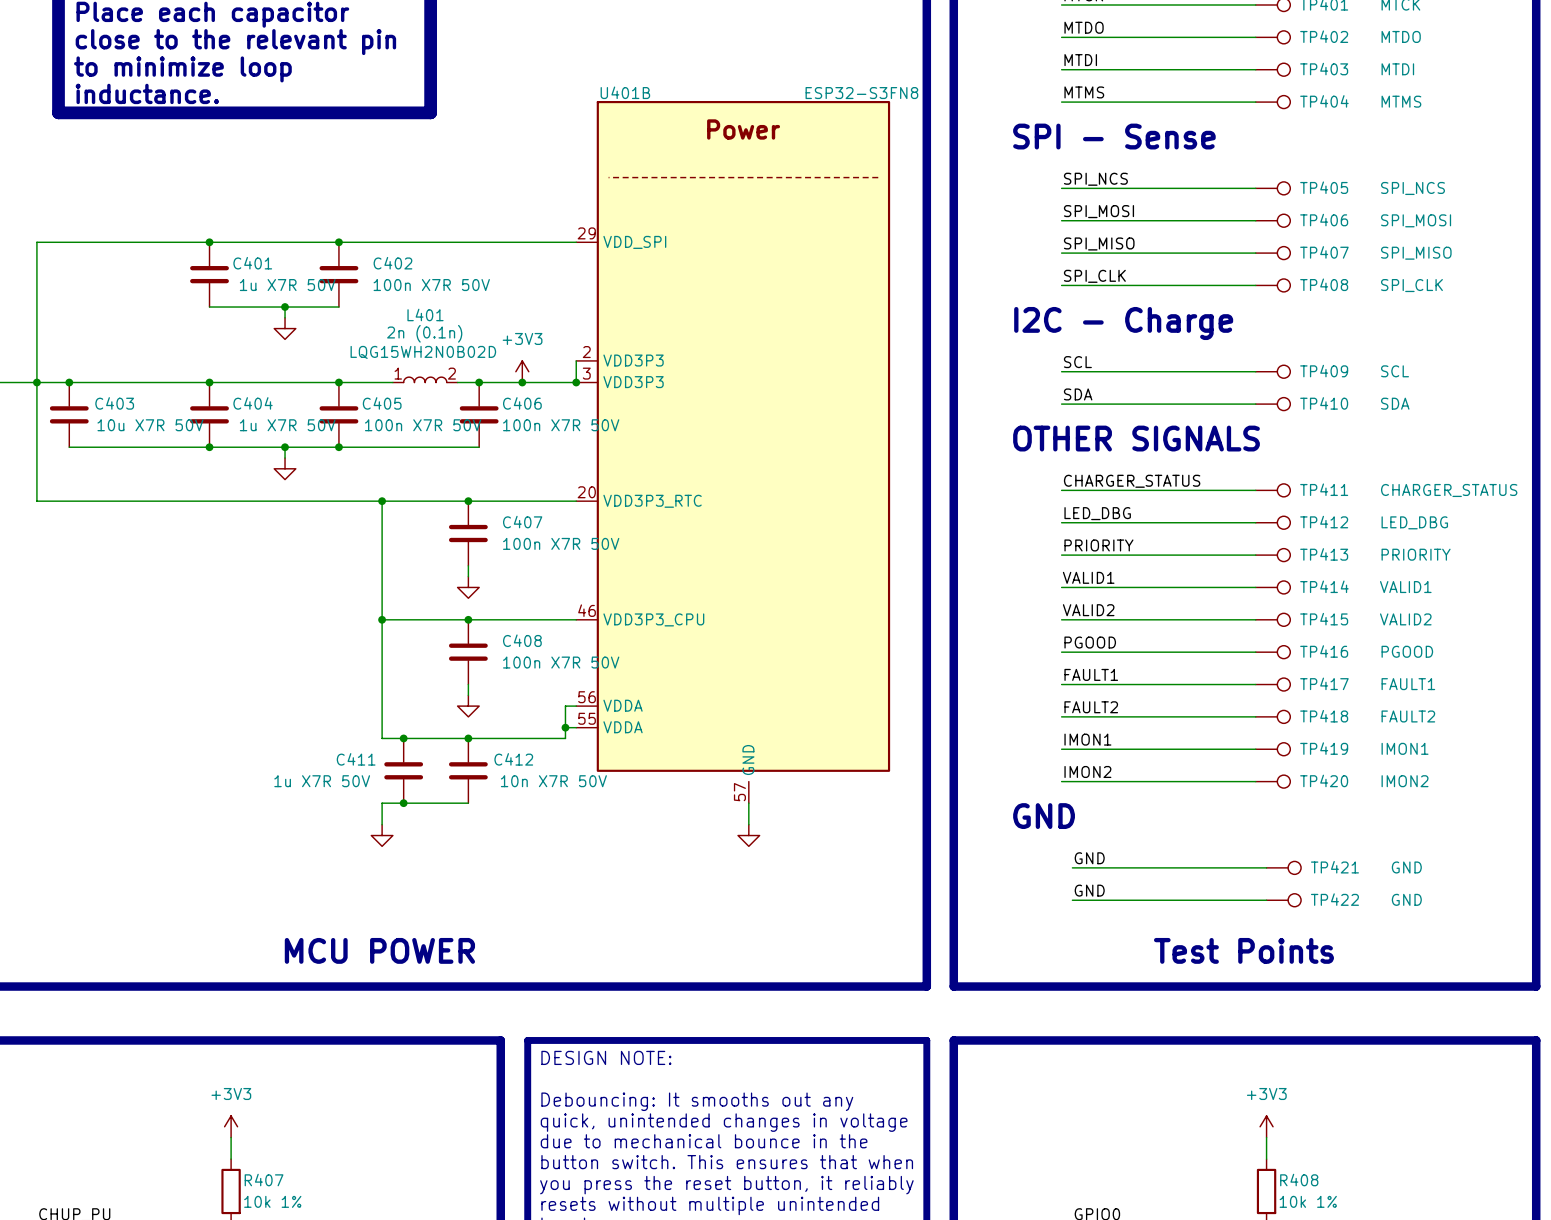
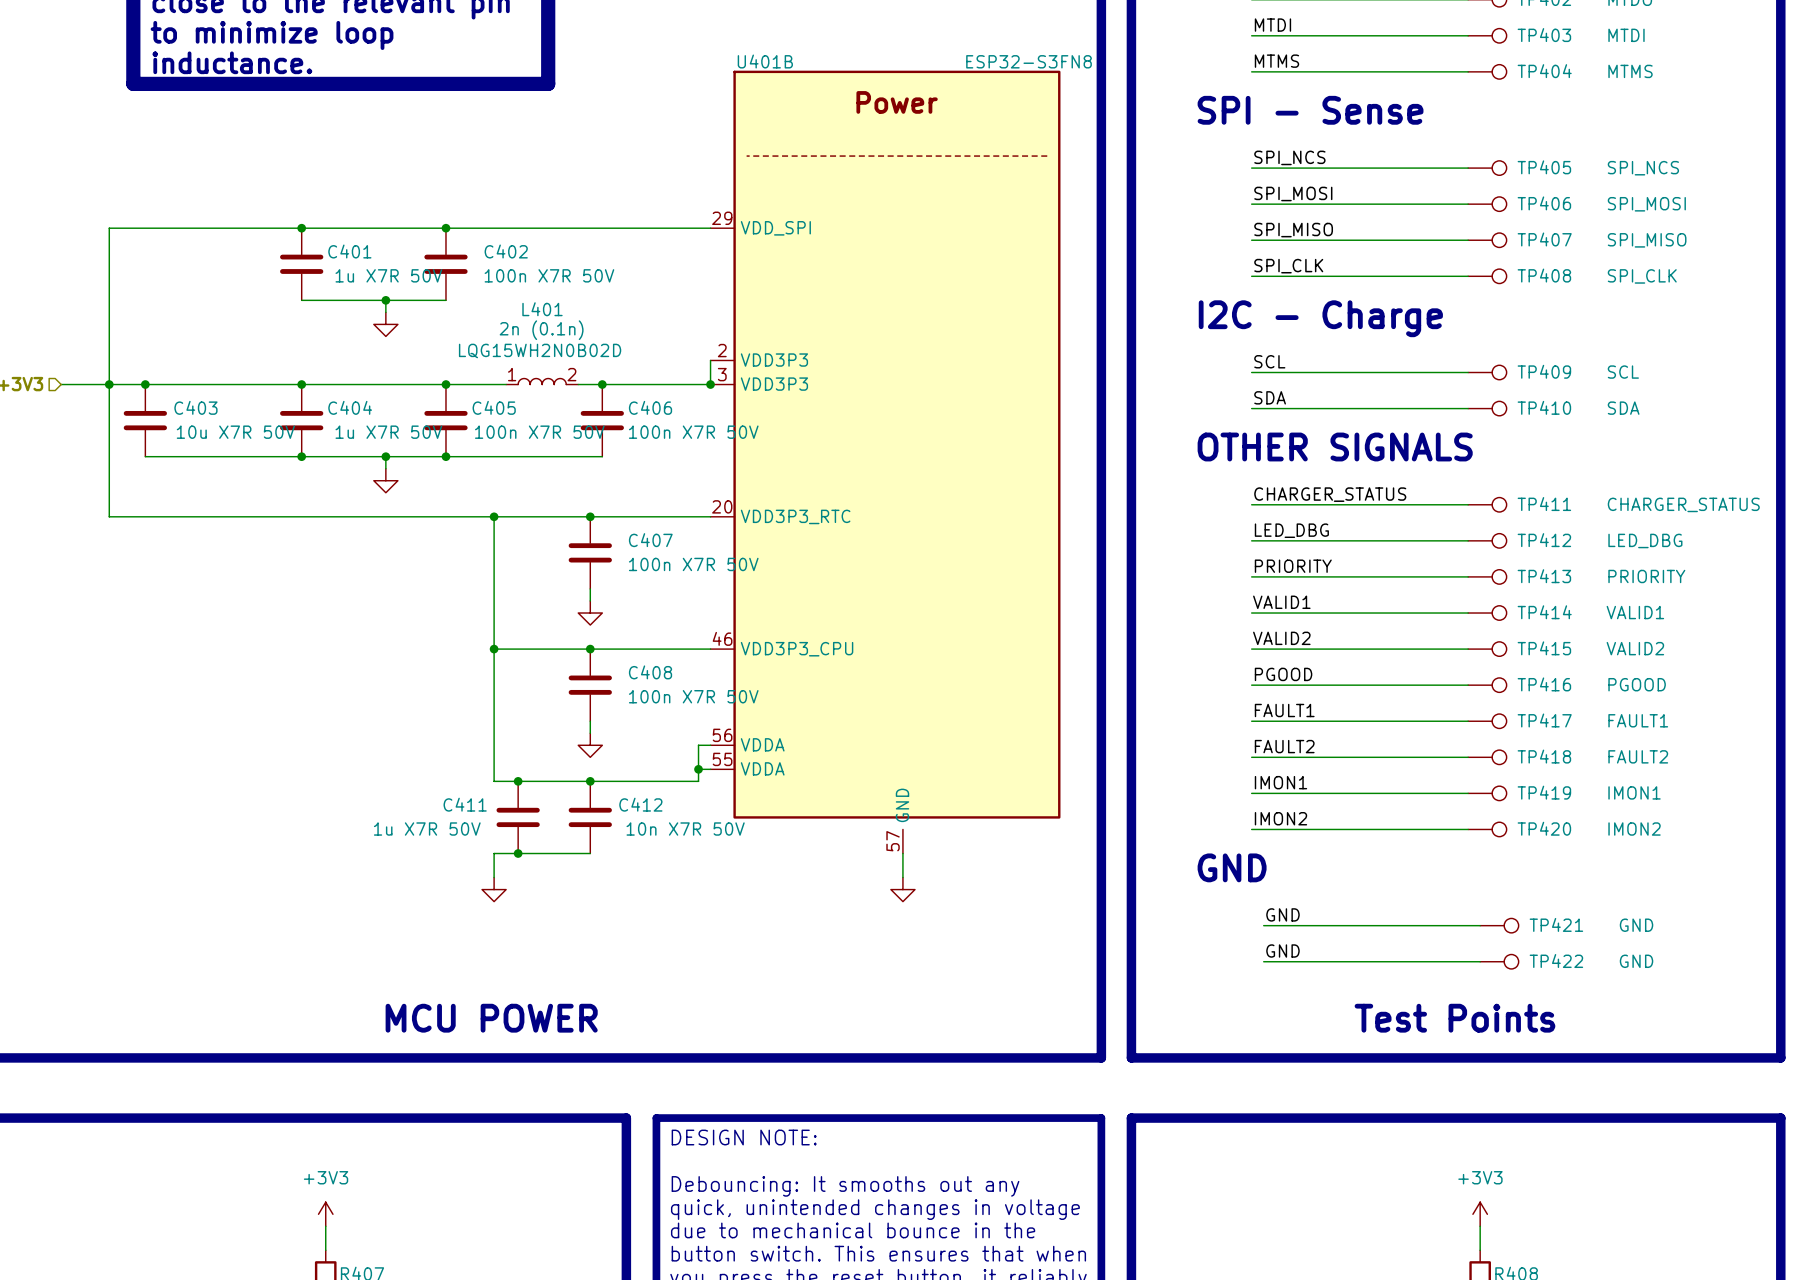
power symbol: +3V3 (522, 371) -> none
junction: (522, 382) -> none

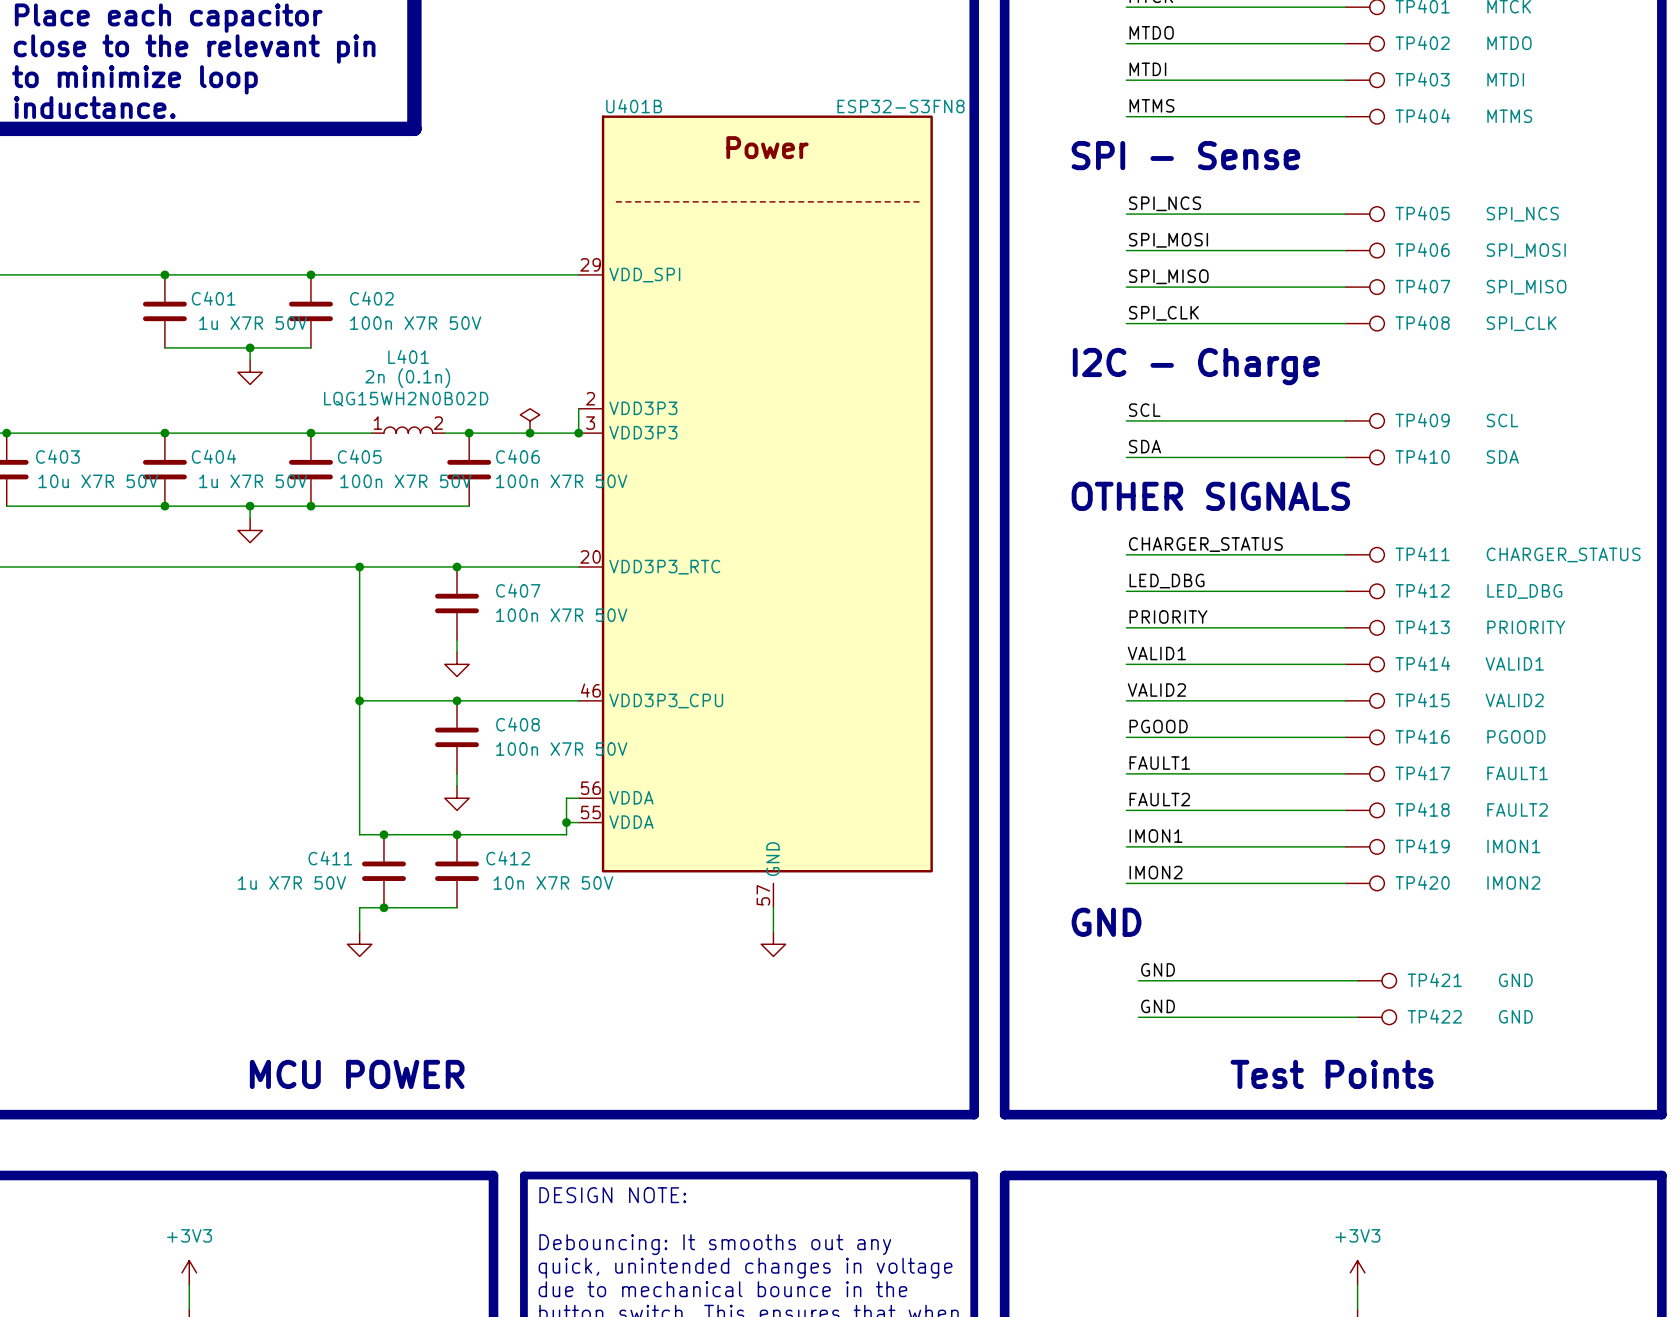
power symbol: none -> (530, 420)
junction: none -> (530, 433)

